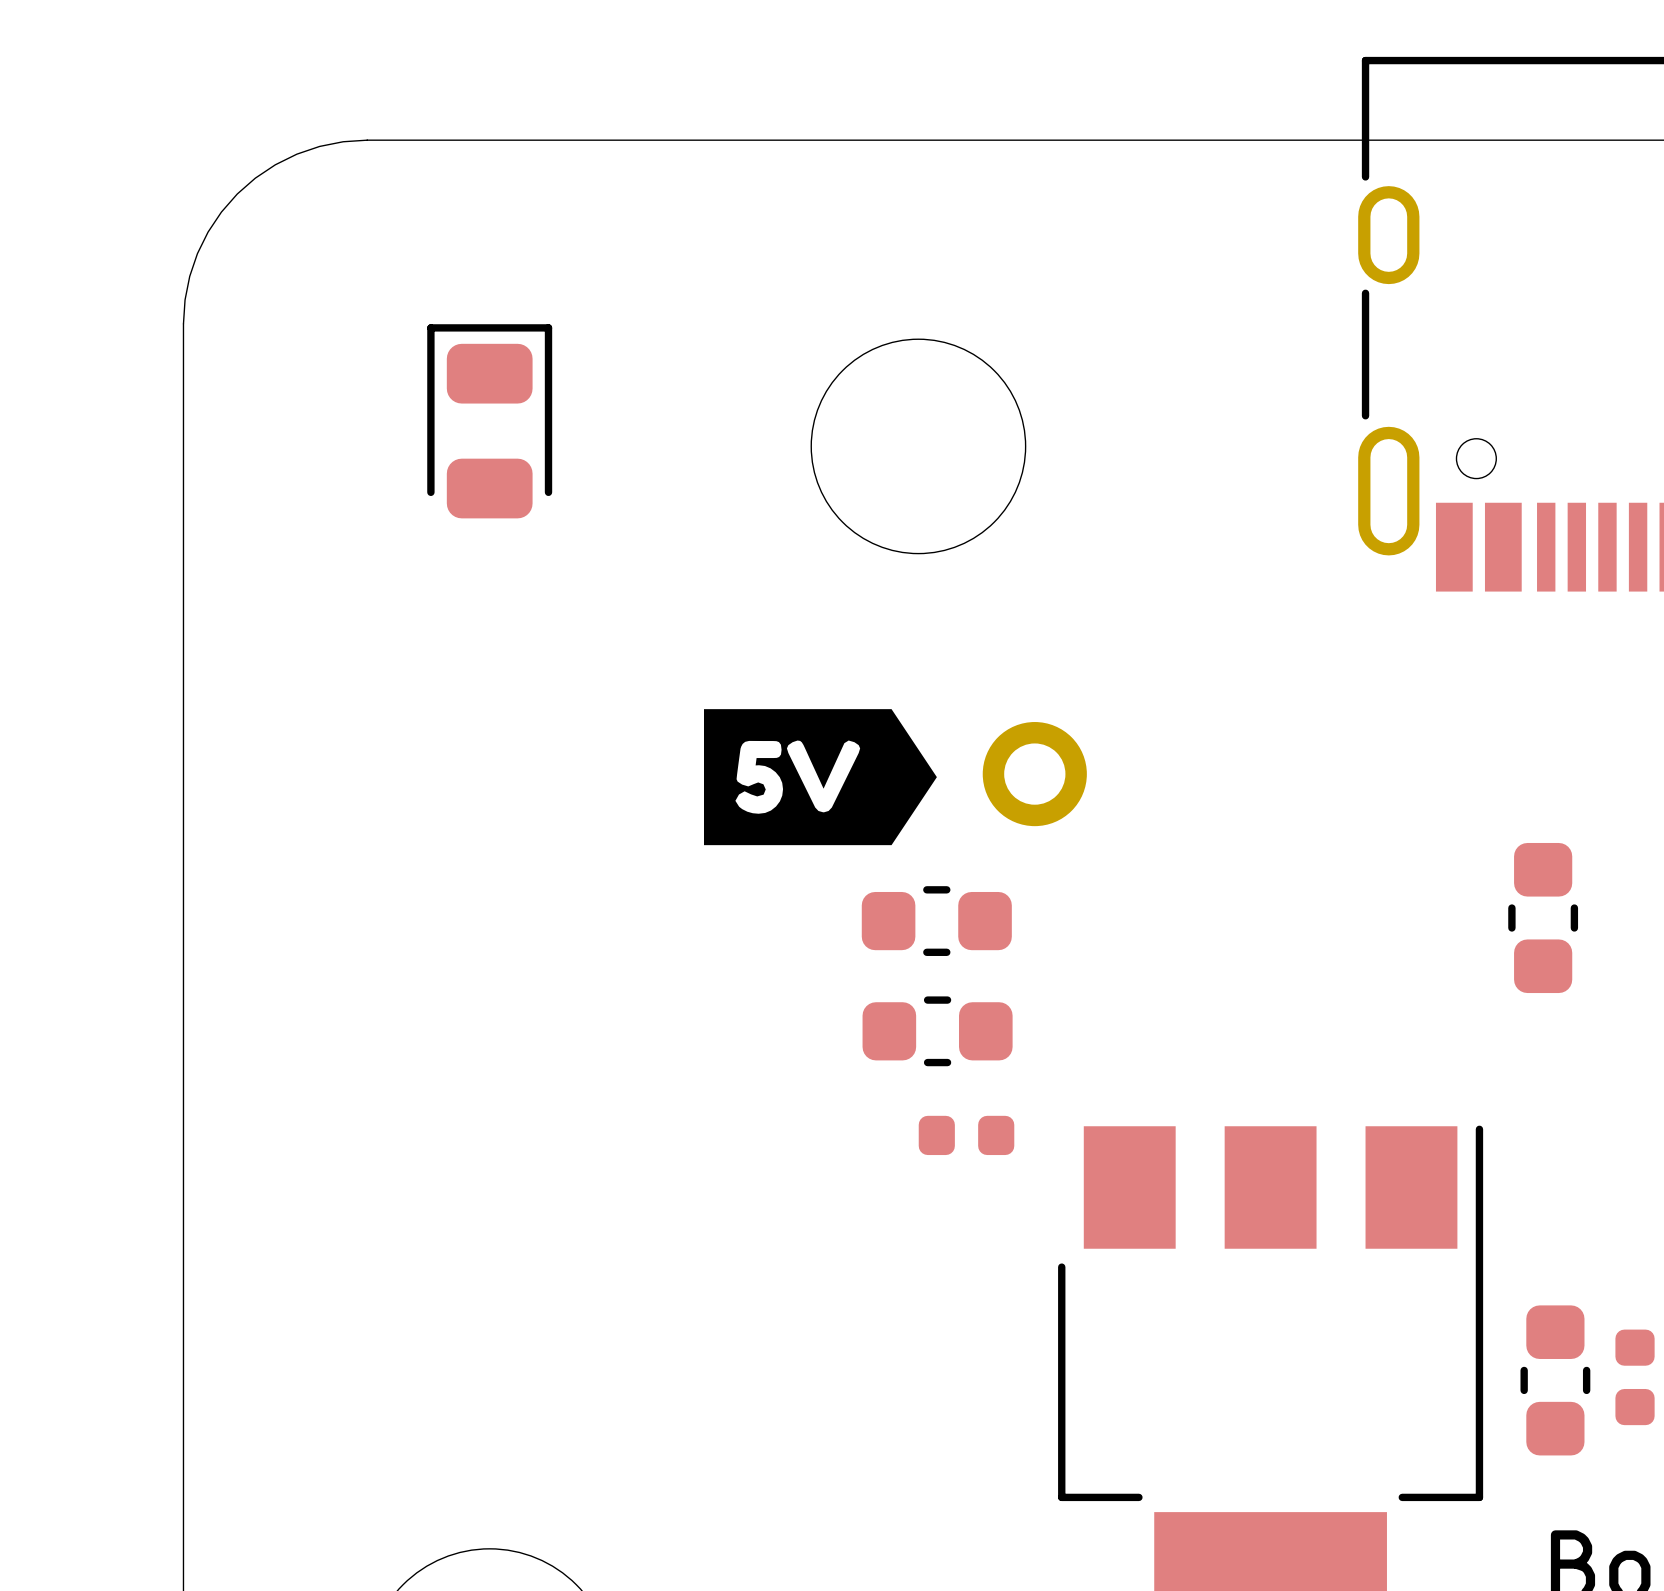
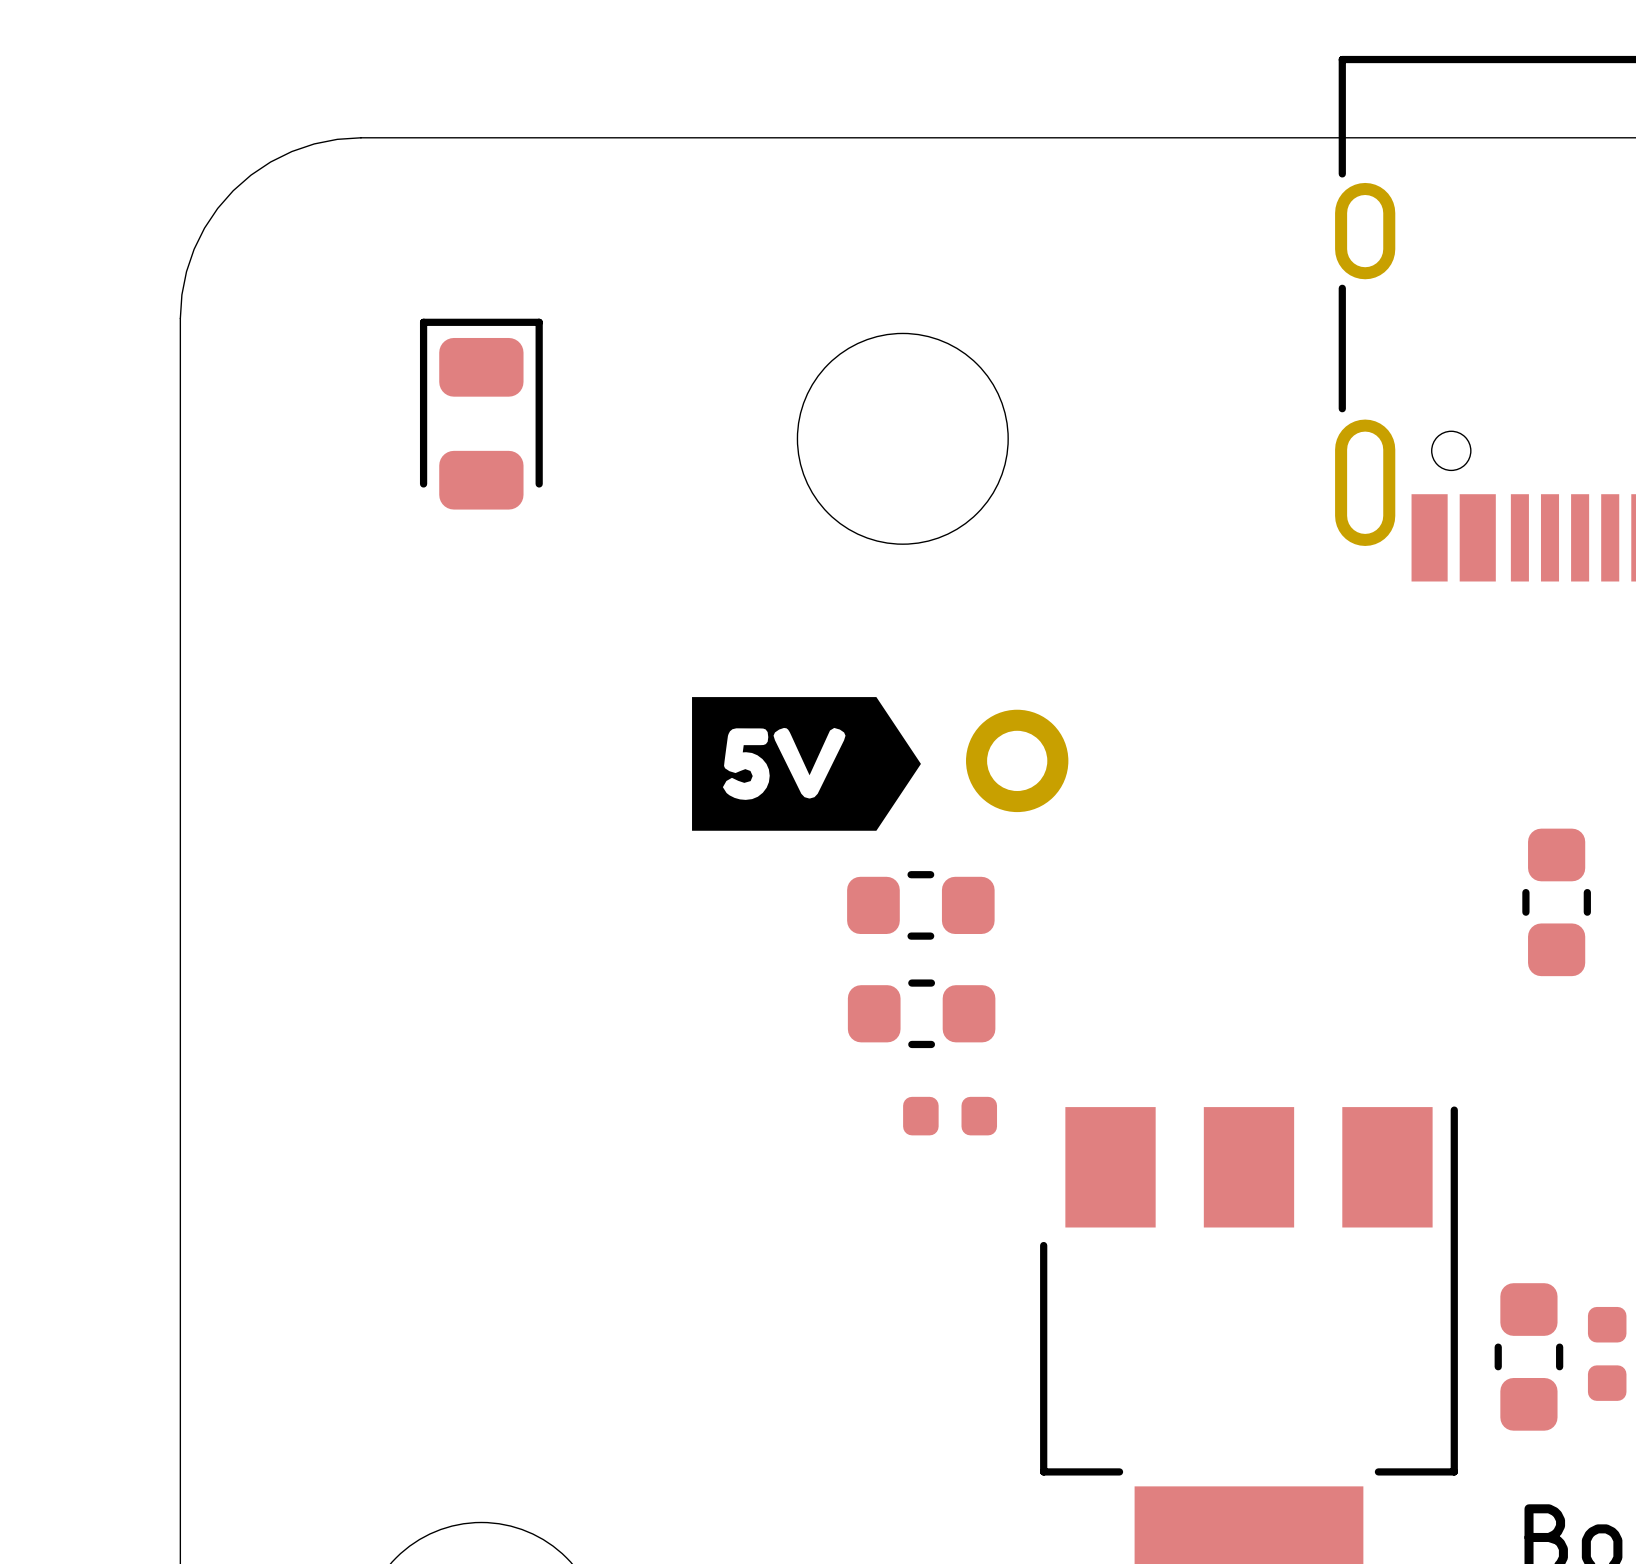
part position: (1543, 918) -> (1556, 902)

